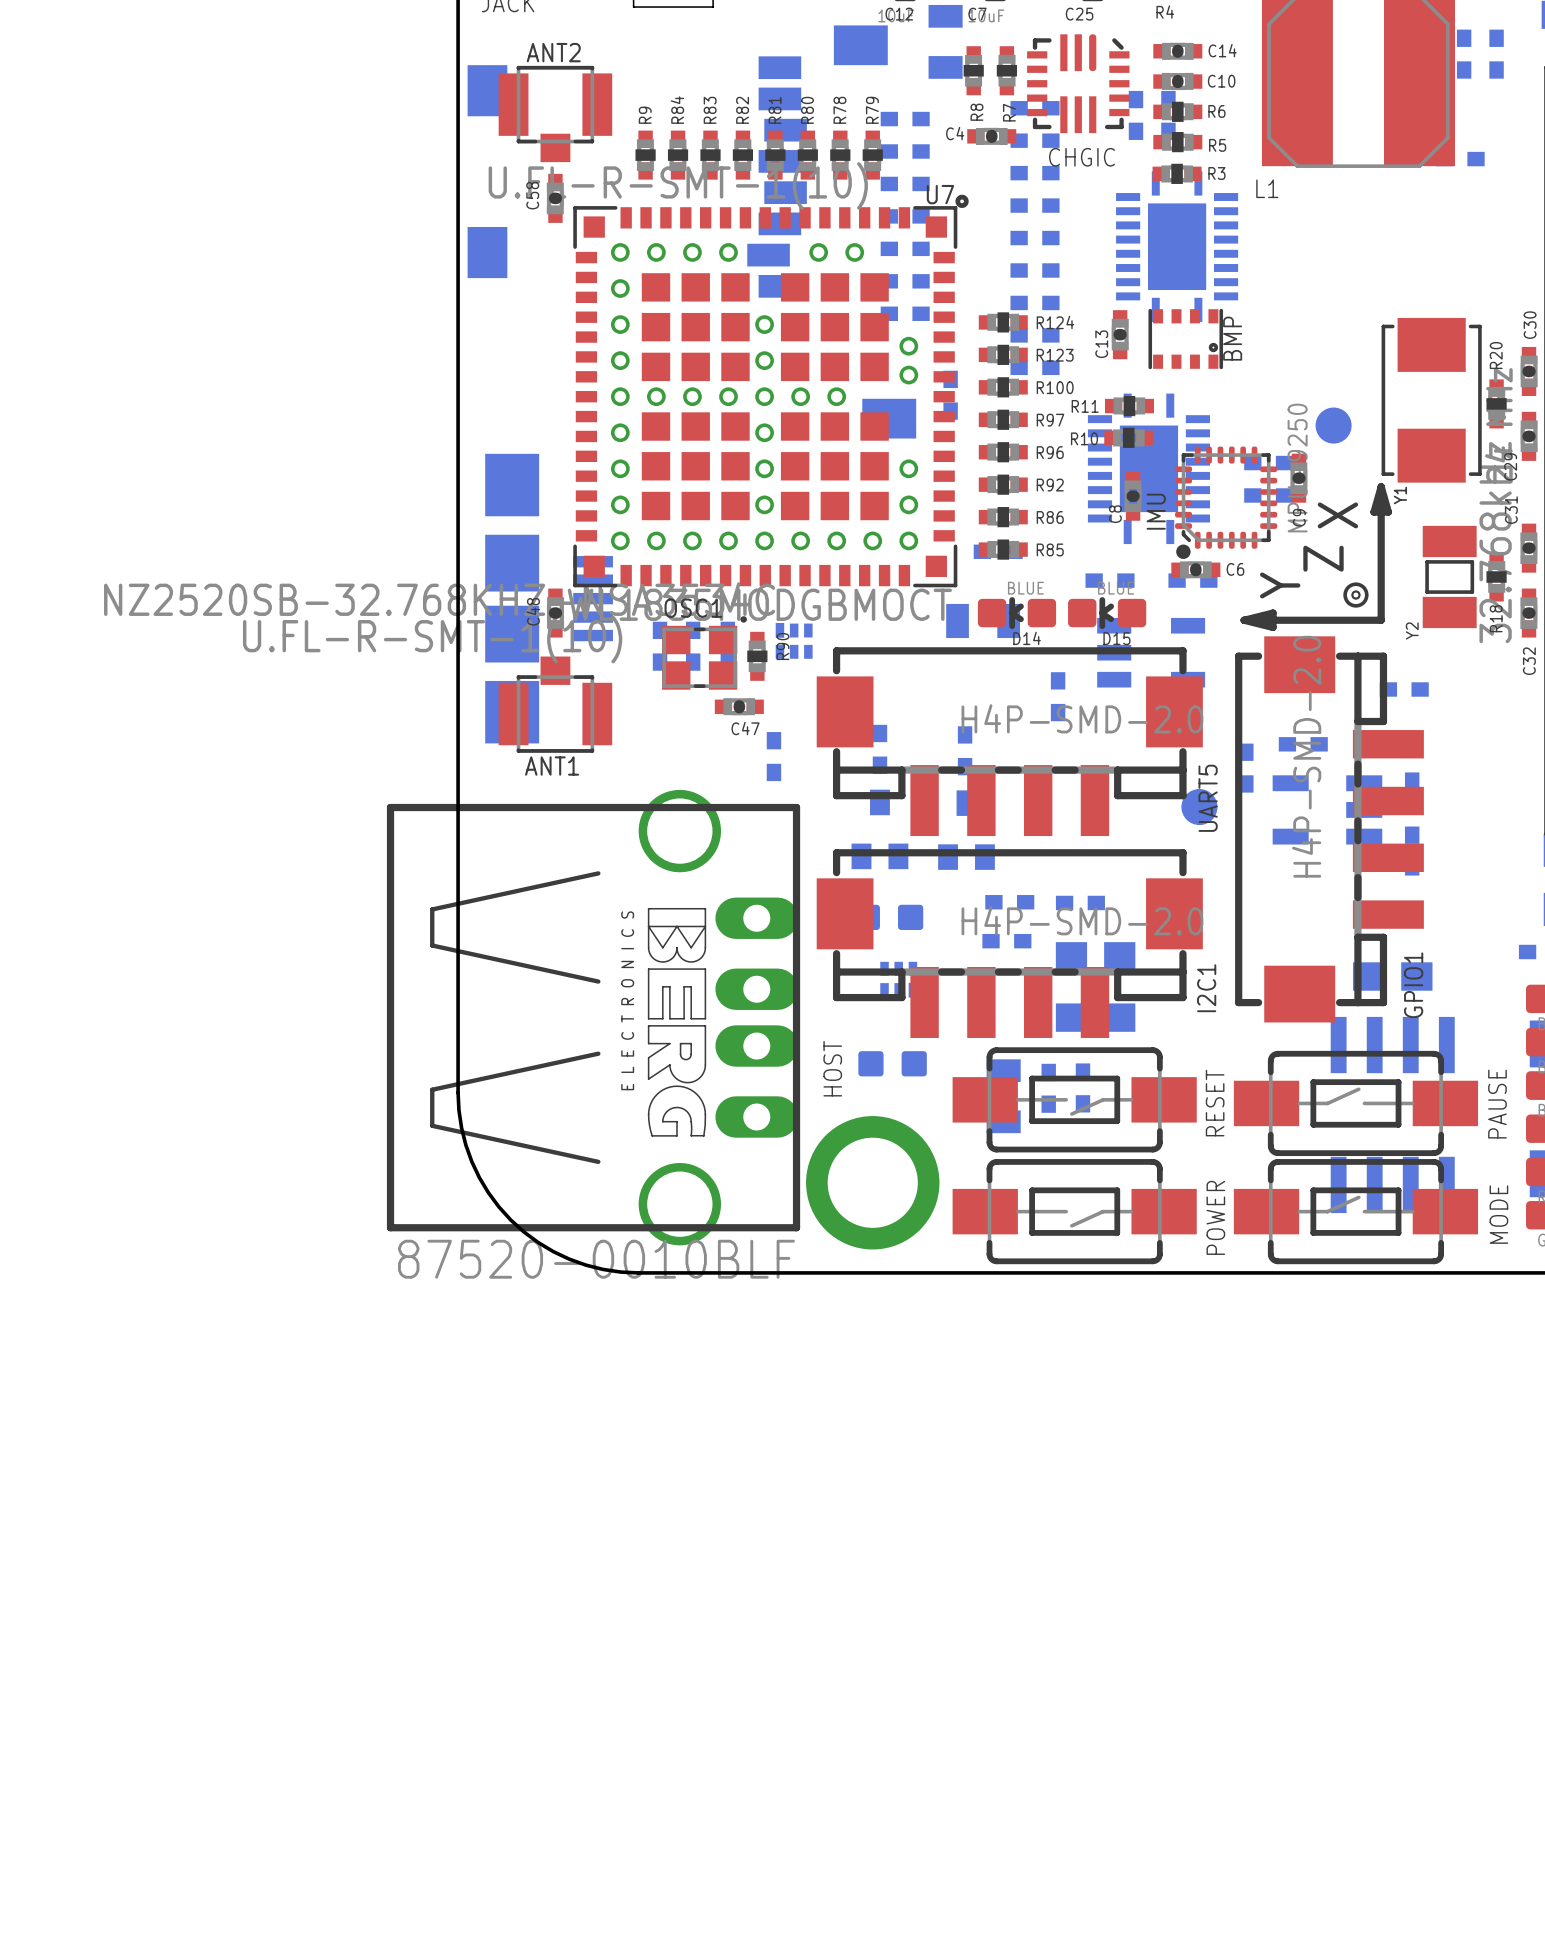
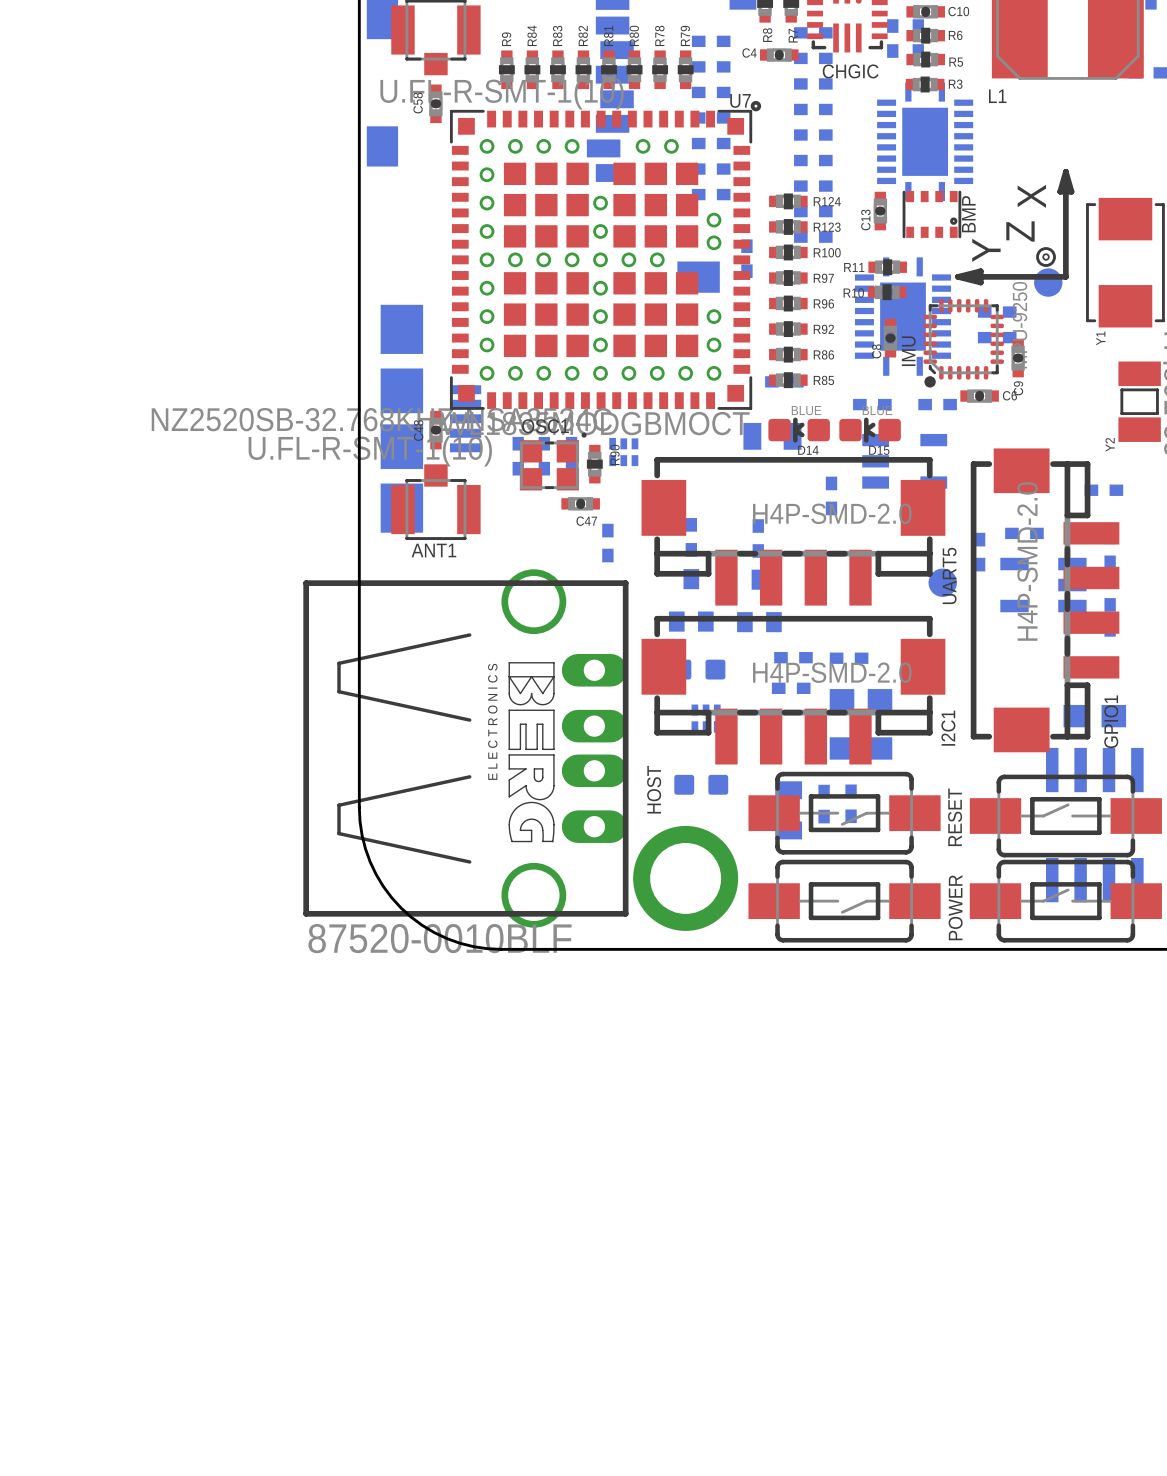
C9 position: (1298, 478) -> (1018, 358)
drawing position: (1316, 557) -> (1014, 227)
C6 position: (1195, 569) -> (979, 396)

